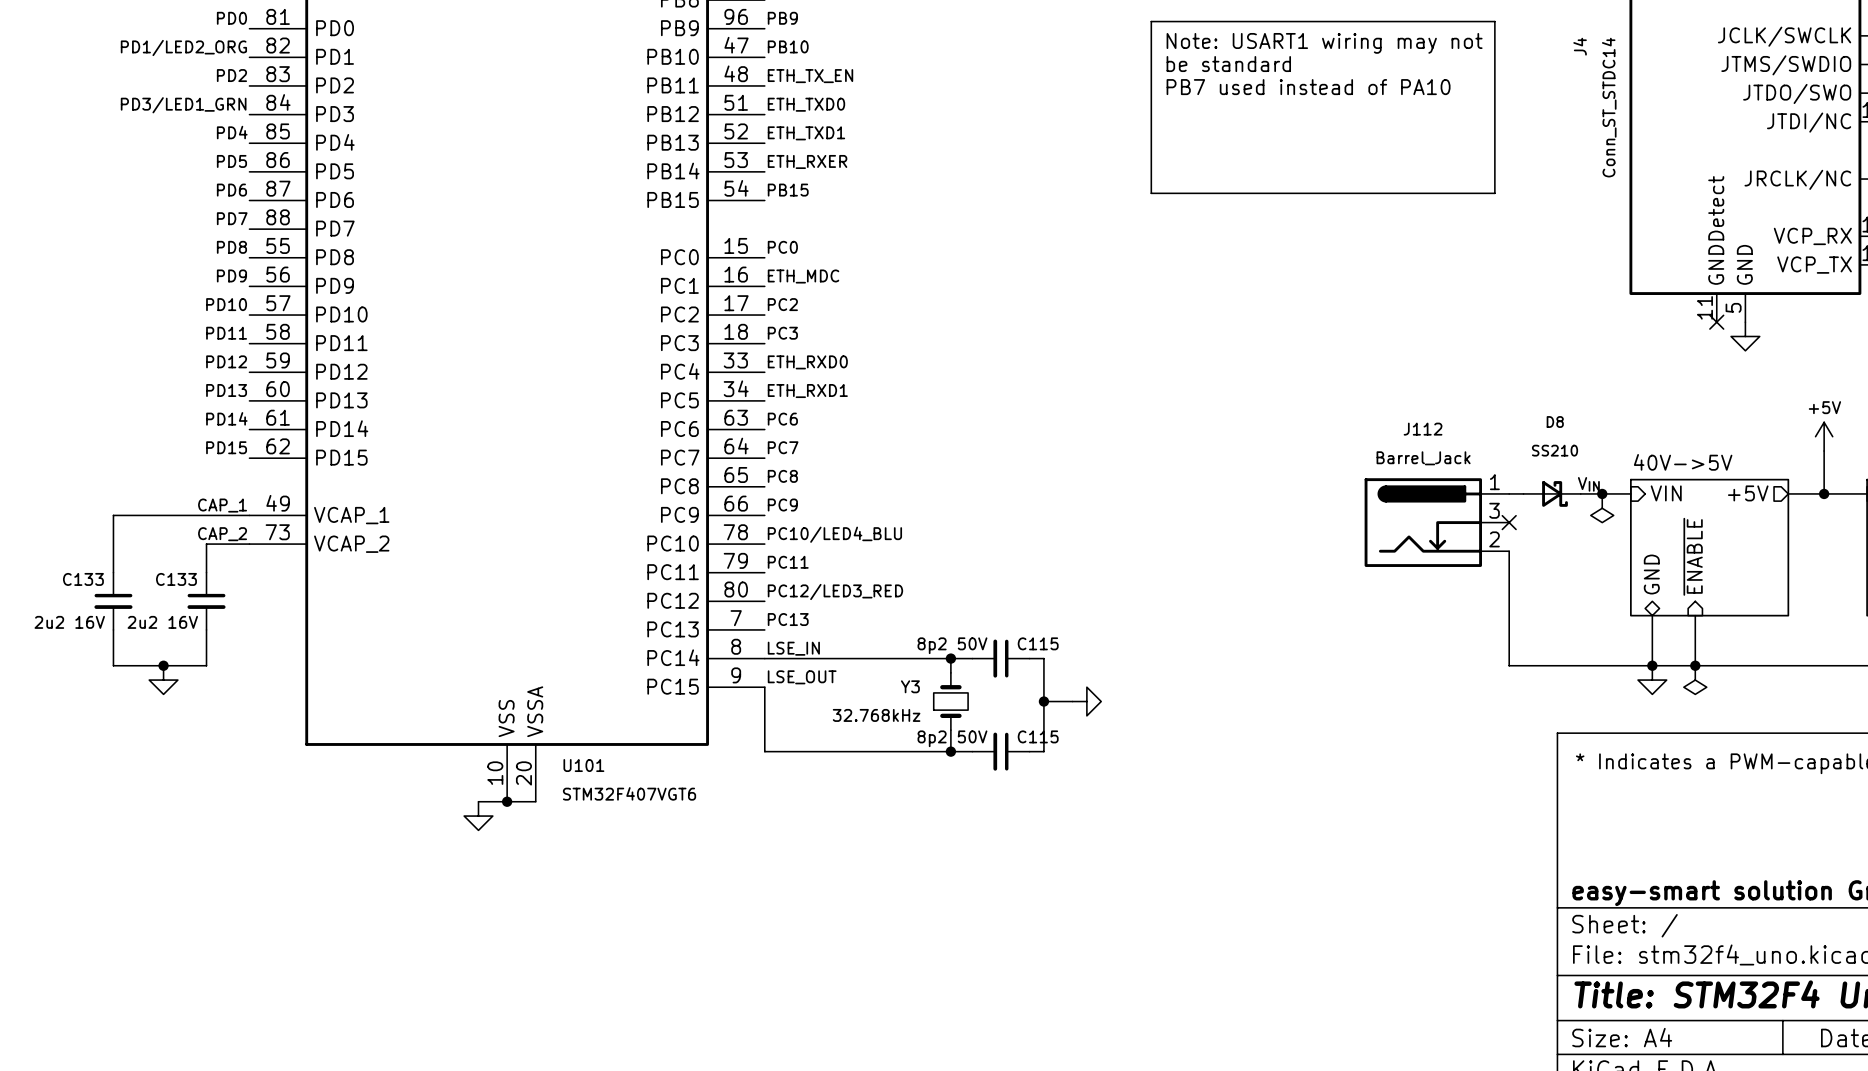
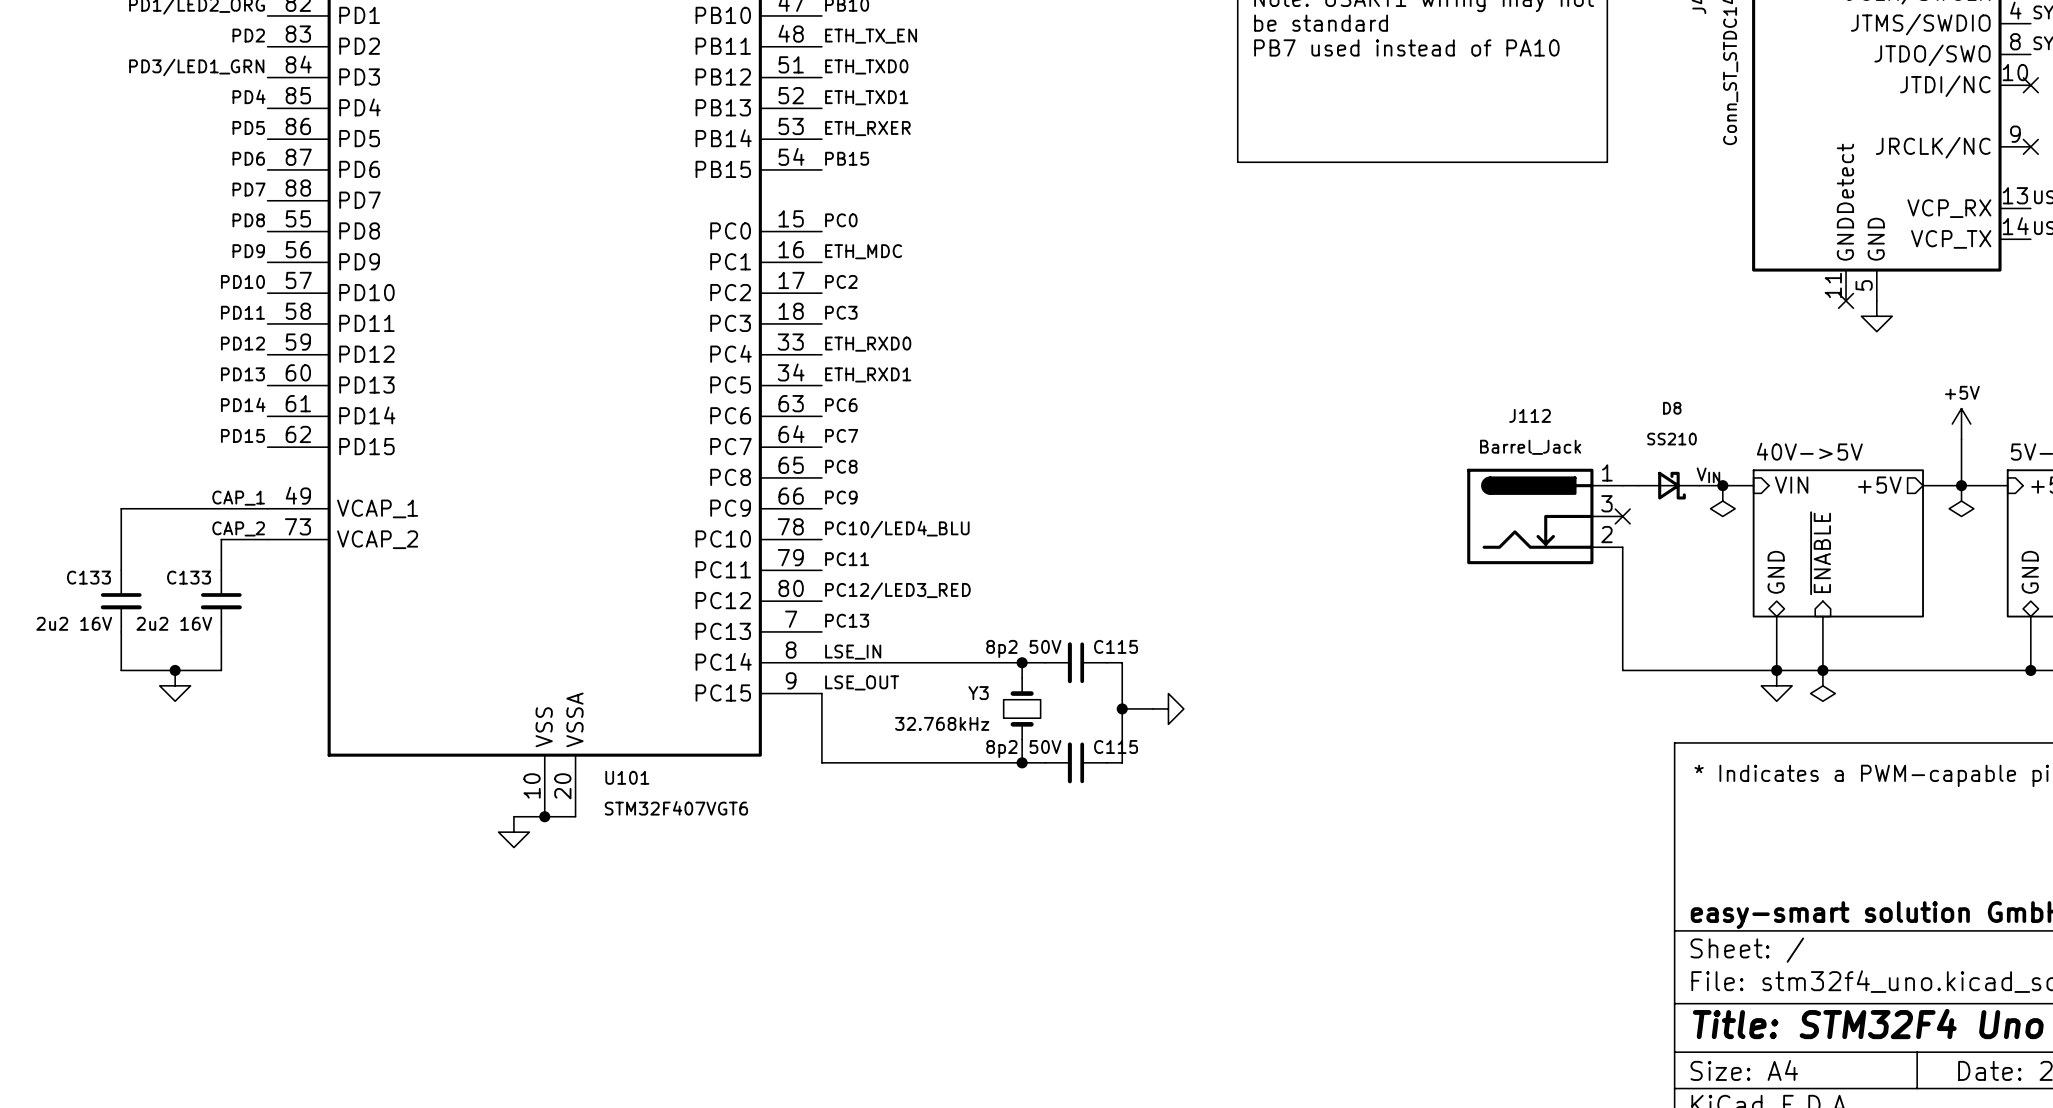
power symbol: none -> (1961, 501)

